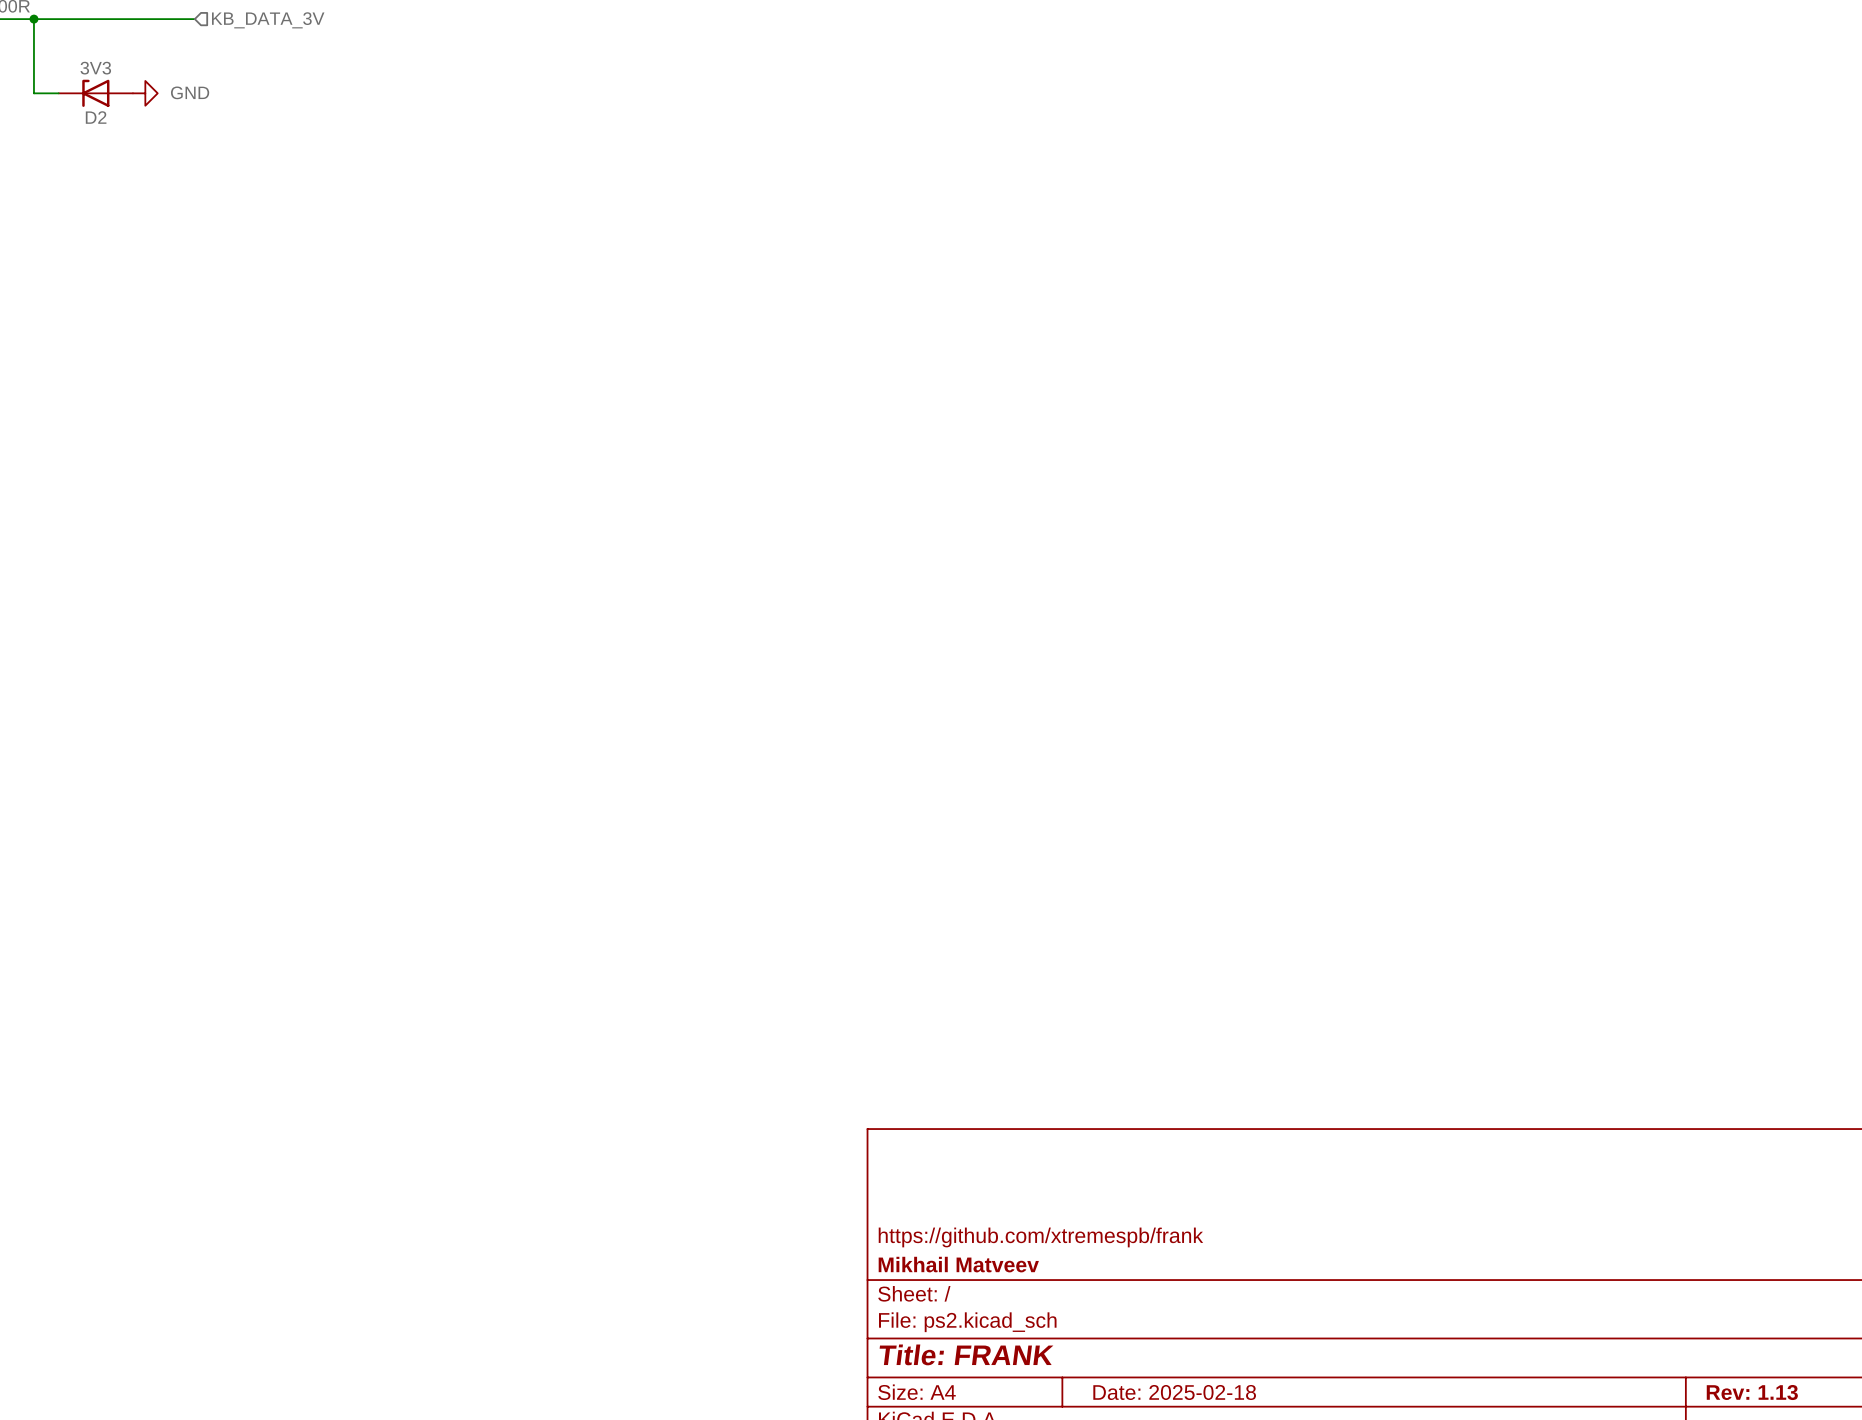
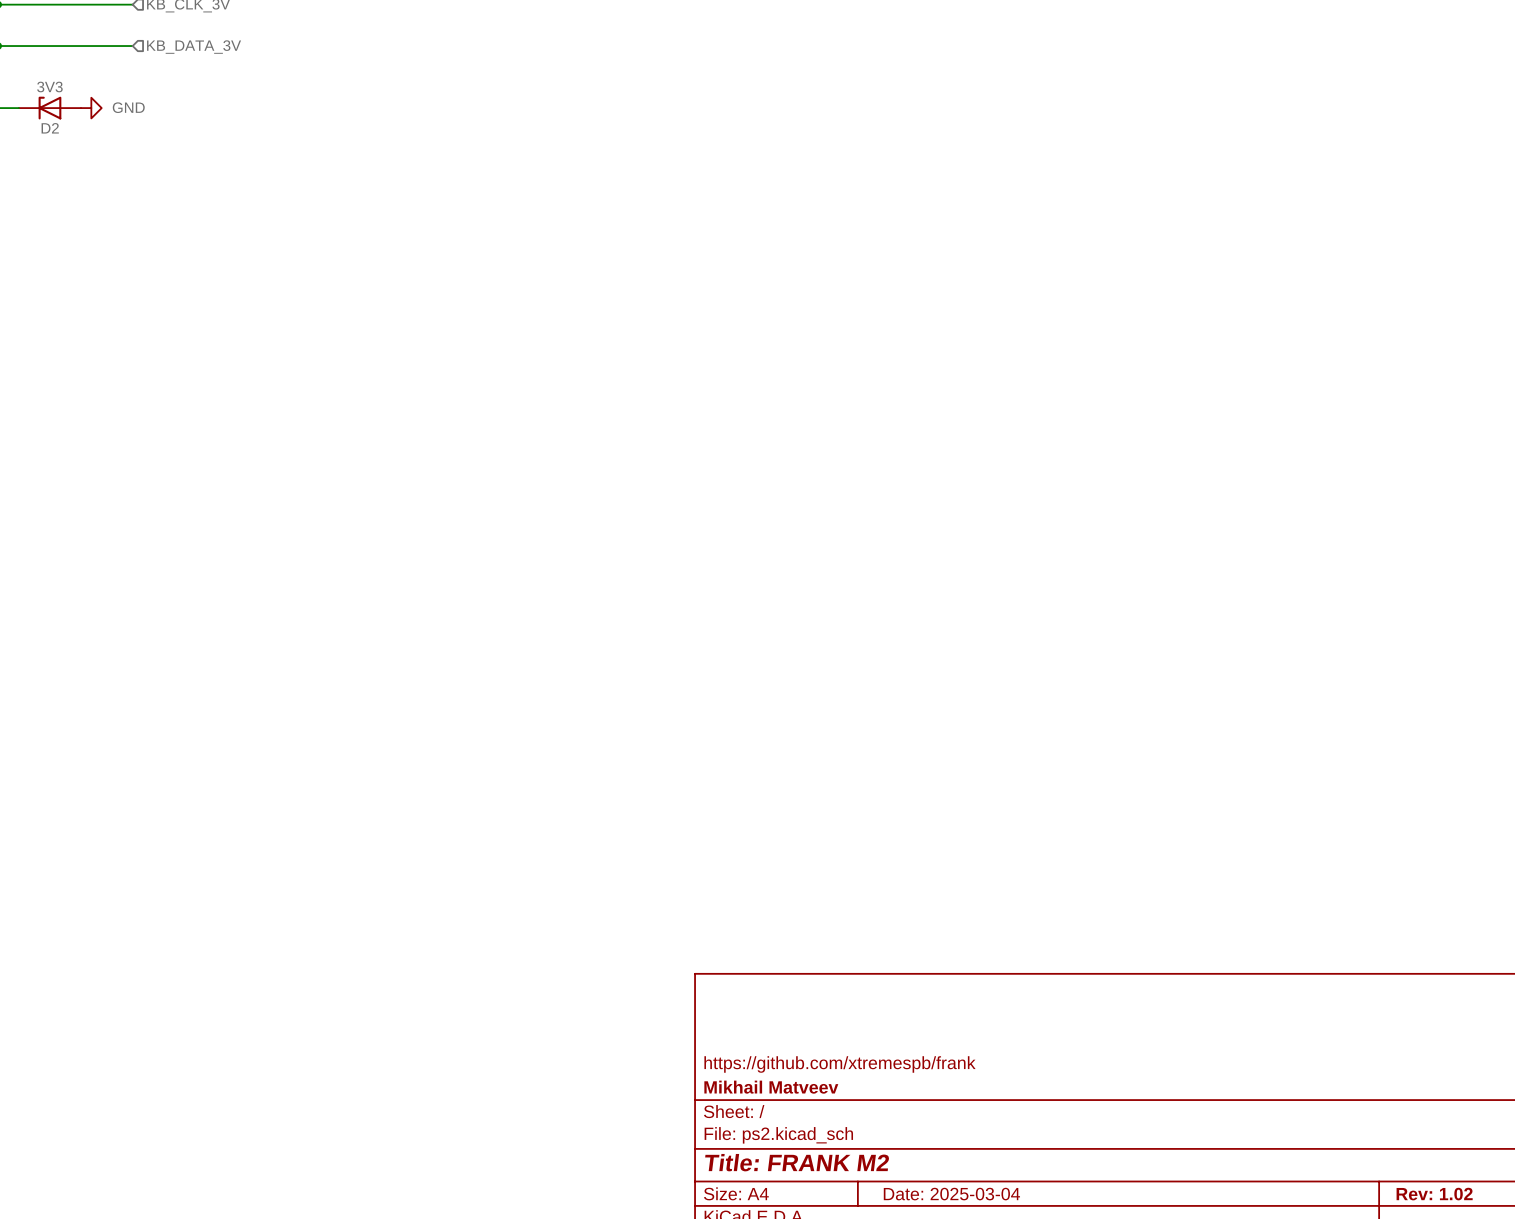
title block: Title: FRANK (966, 1354) -> Title: FRANK M2 (797, 1162)
title block: Date: 2025-02-18 (1174, 1392) -> Date: 2025-03-04 (951, 1194)
title block: Rev: 1.13 (1752, 1392) -> Rev: 1.02 (1434, 1194)

